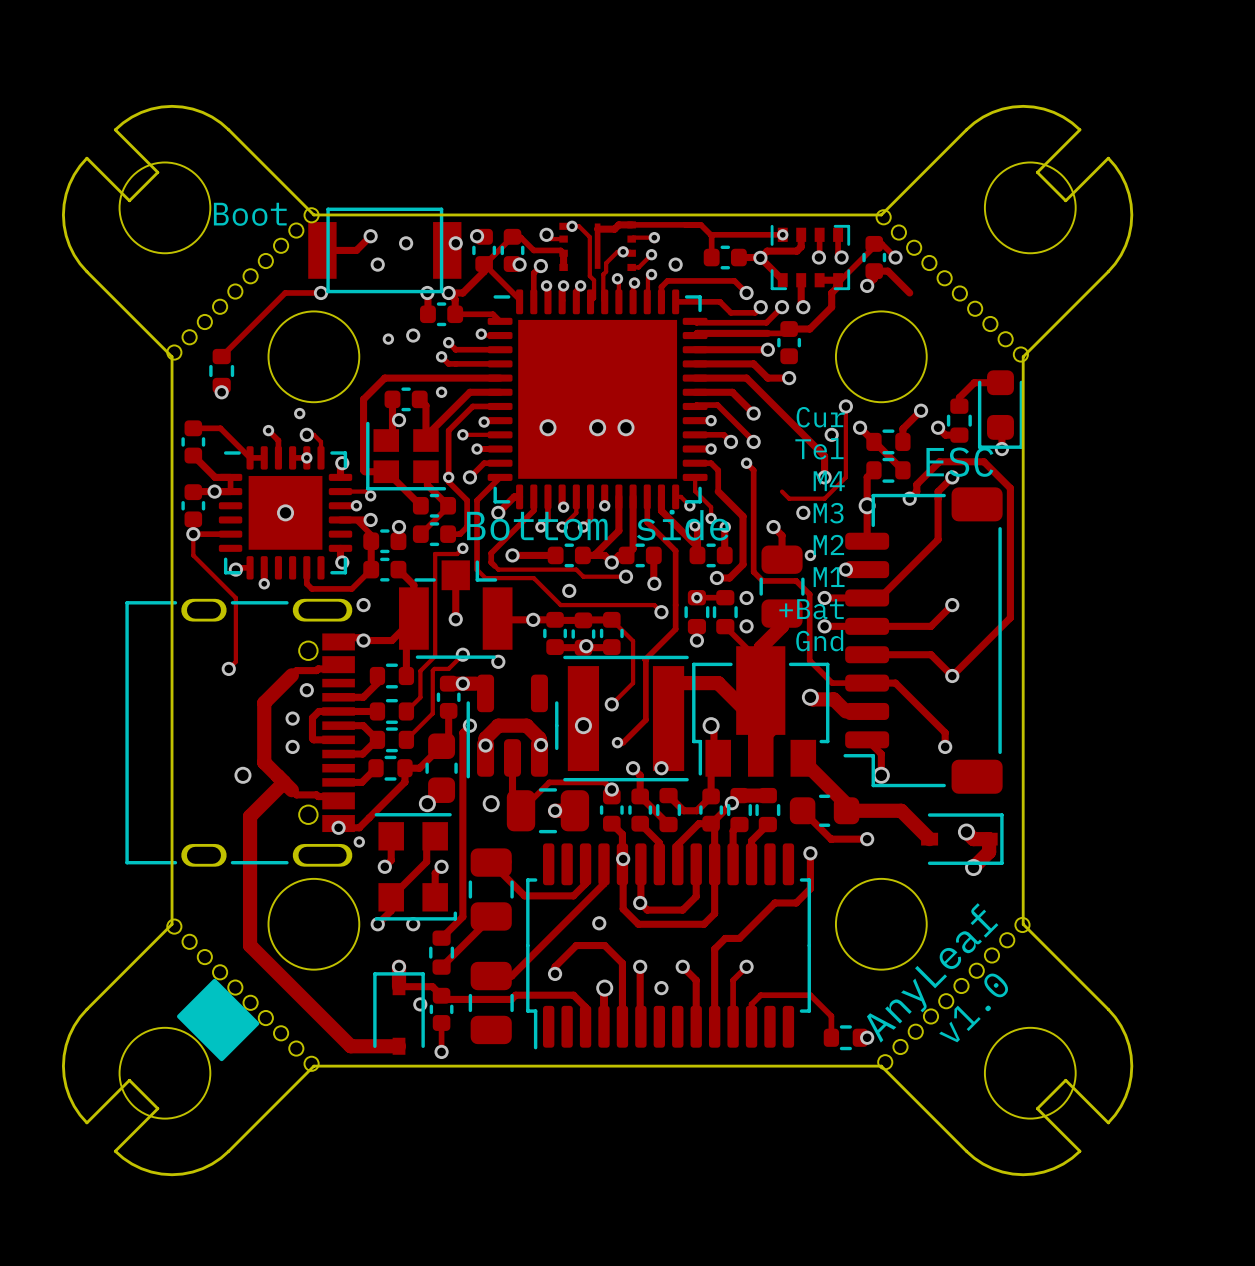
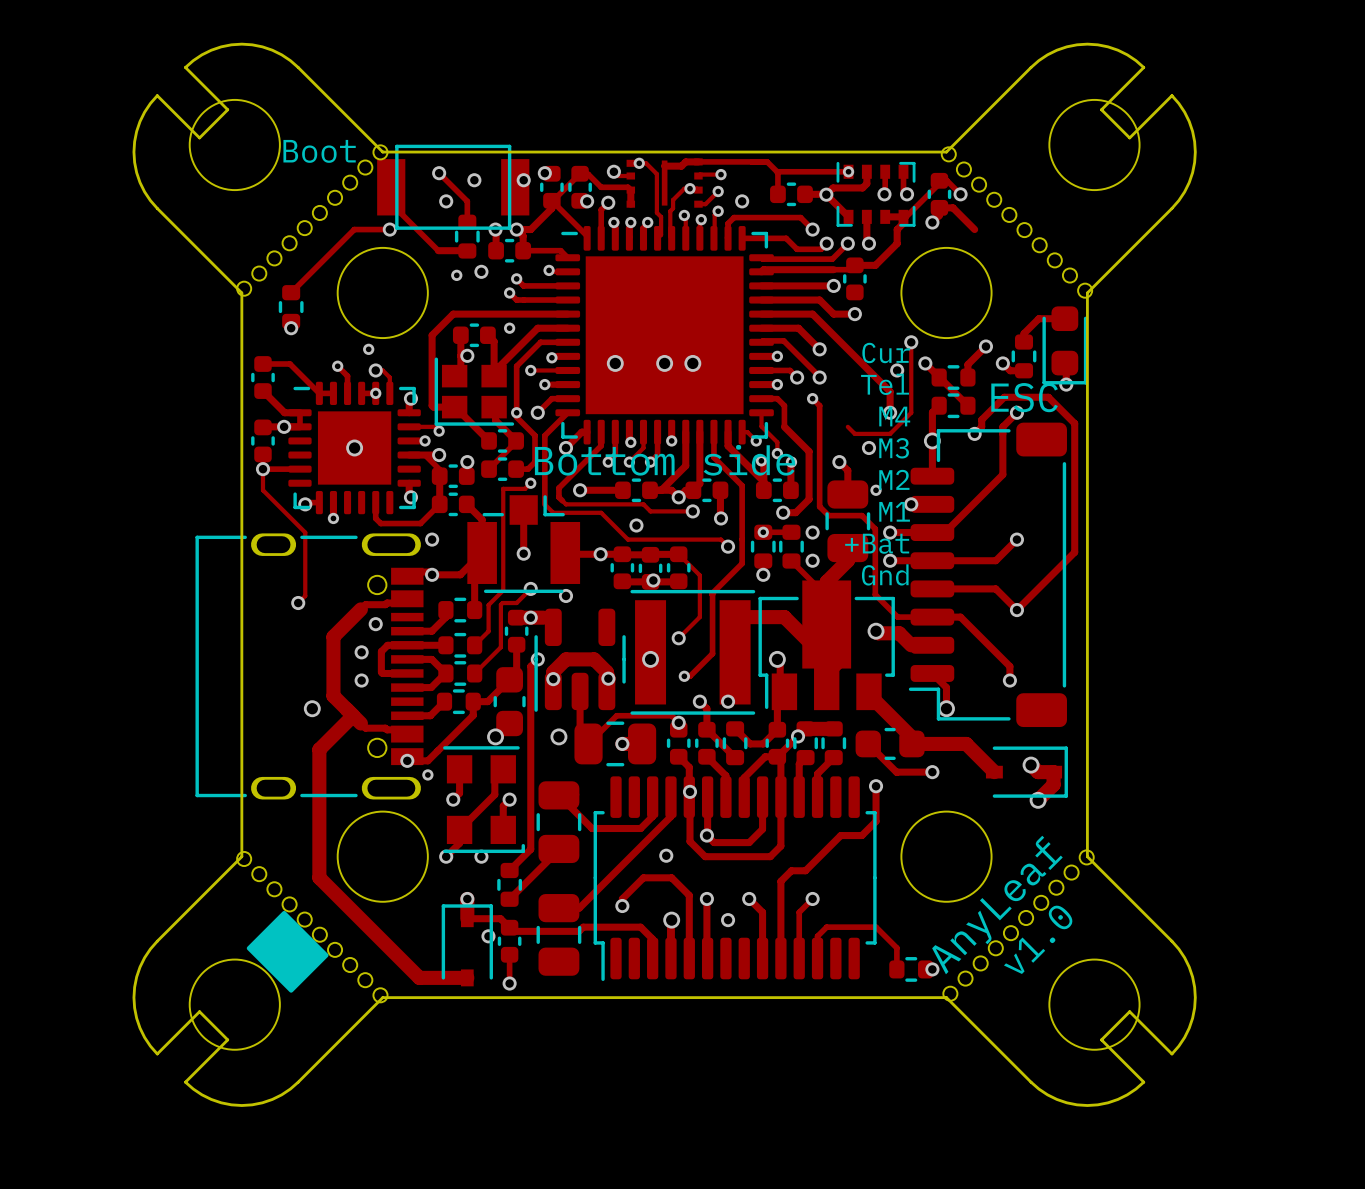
track: (370, 236) (356, 250) (322, 250) -> (439, 173) (467, 201) (467, 222)
track: none -> (391, 203) (438, 250) (467, 250)
part: none -> (467, 236)

